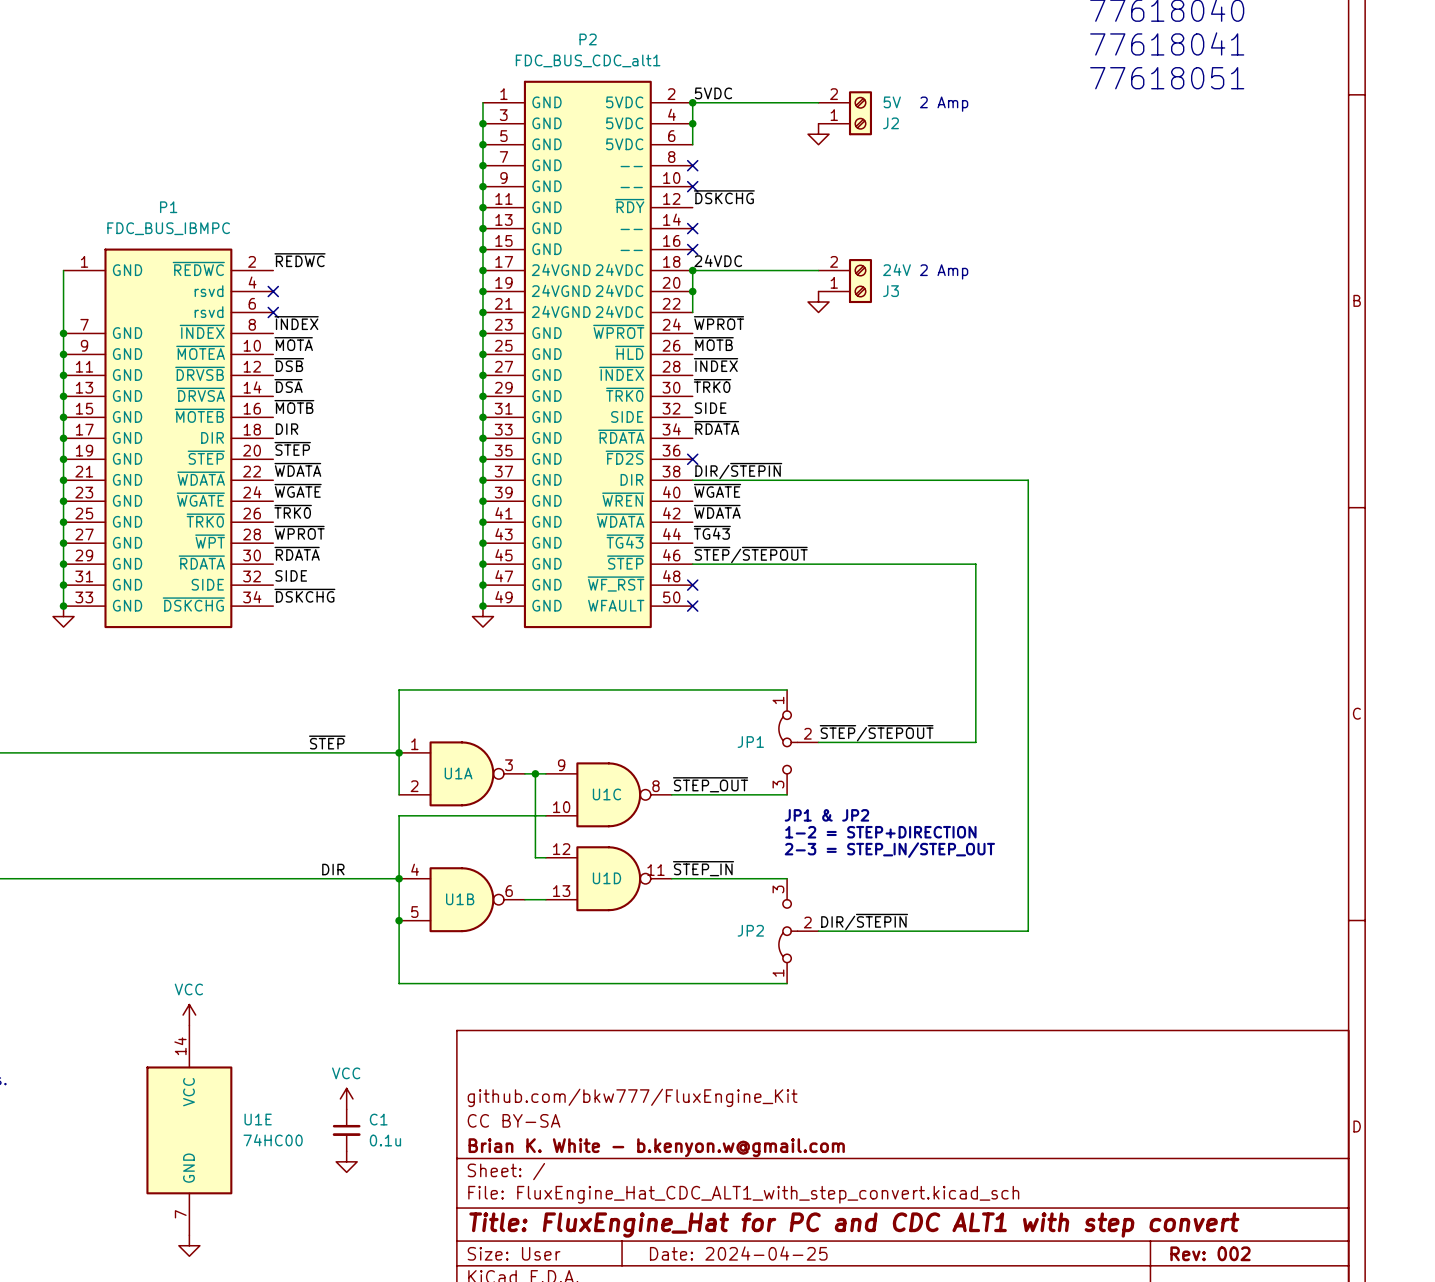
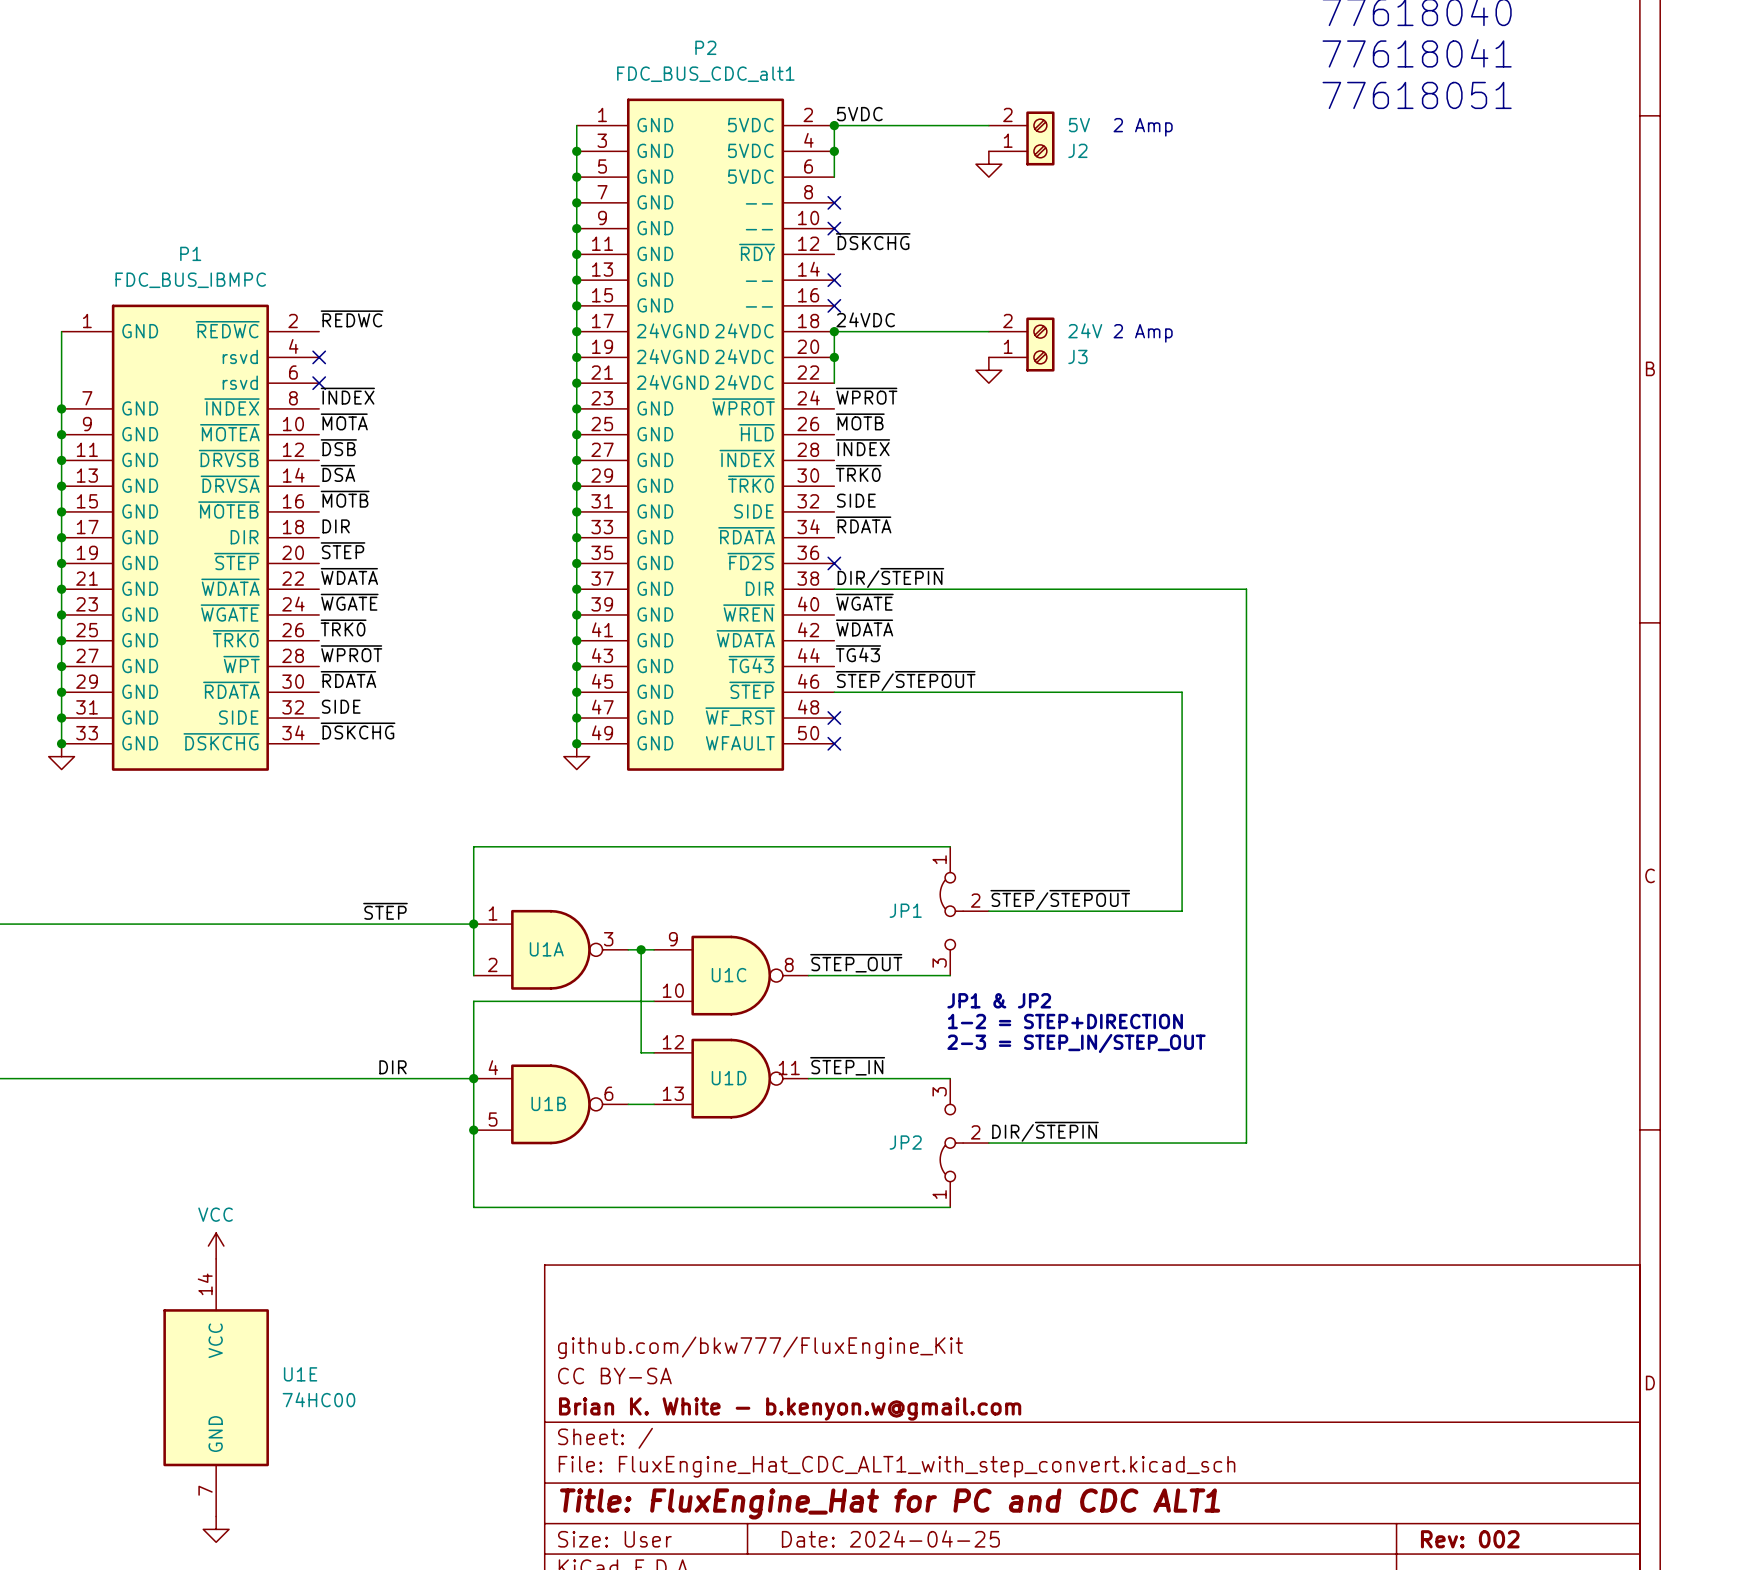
power symbol: VCC (346, 1098) -> none
C1: 0.1u (346, 1130) -> none
power symbol: (346, 1161) -> none
title block: Title: FluxEngine_Hat for PC and CDC ALT1 with step convert (854, 1225) -> Title: FluxEngine_Hat for PC and CDC ALT1 (890, 1503)

